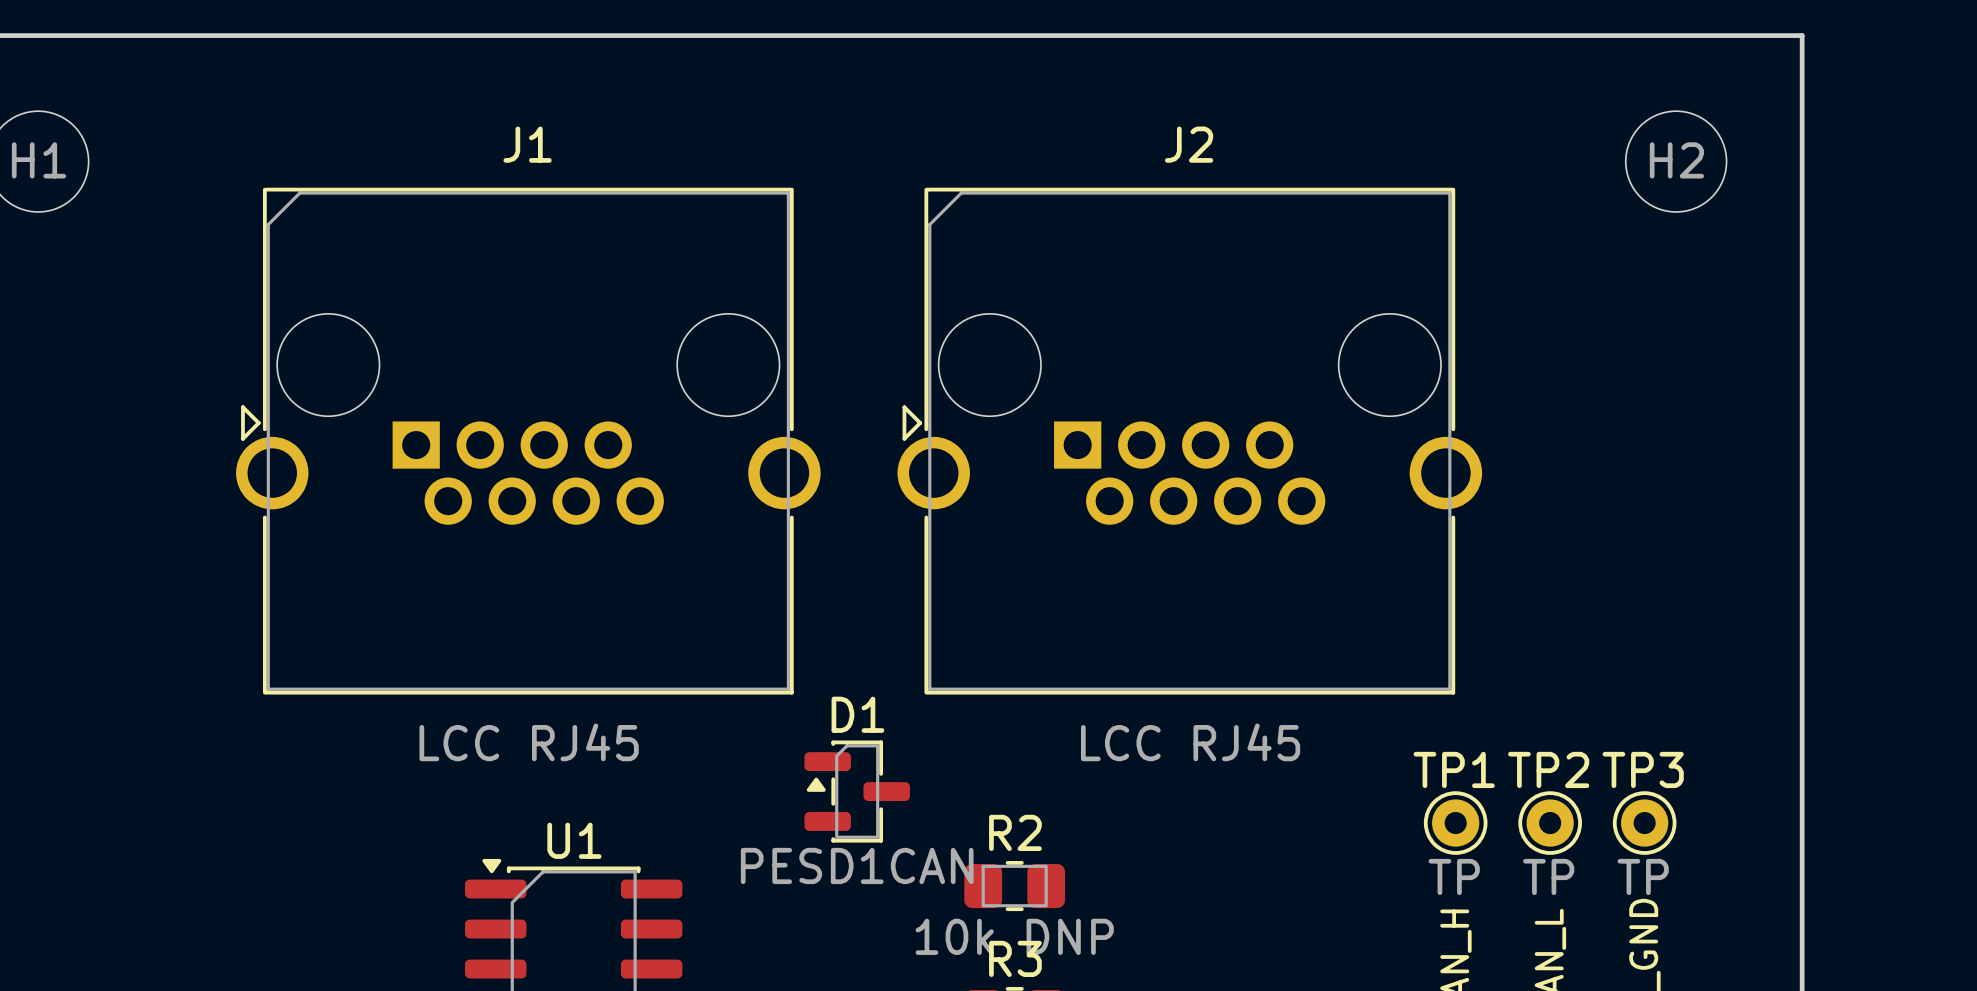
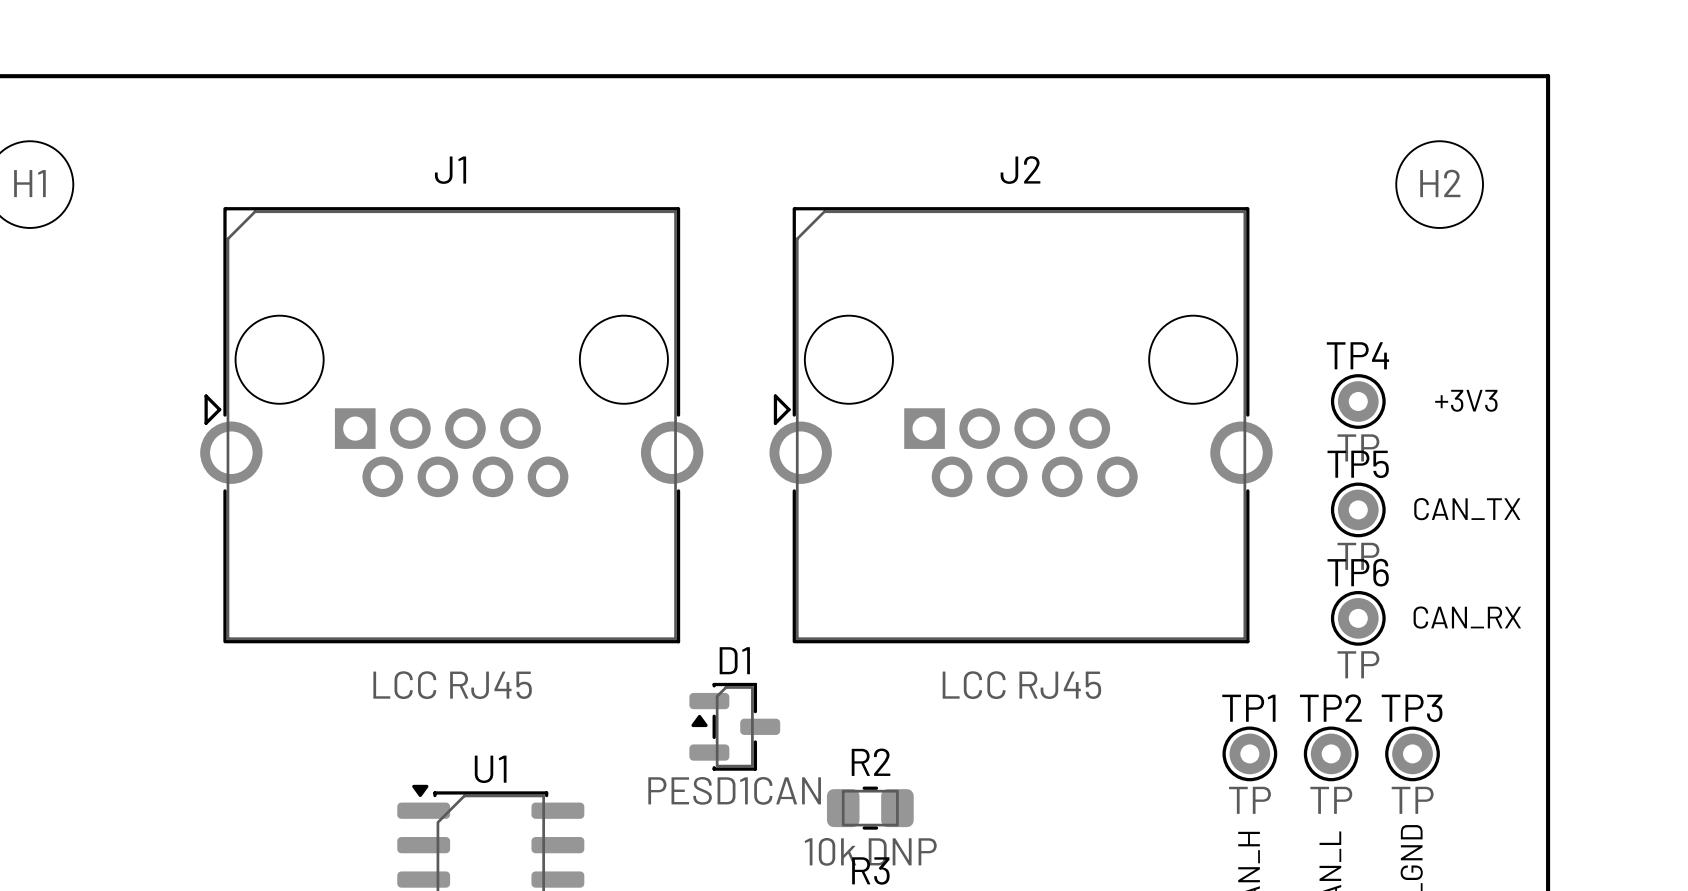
text: none -> +3V3 (1466, 400)
TP4: none -> TP (1358, 401)
TP5: none -> TP (1358, 509)
text: none -> CAN_TX (1467, 509)
TP6: none -> TP (1358, 618)
text: none -> CAN_RX (1467, 617)

